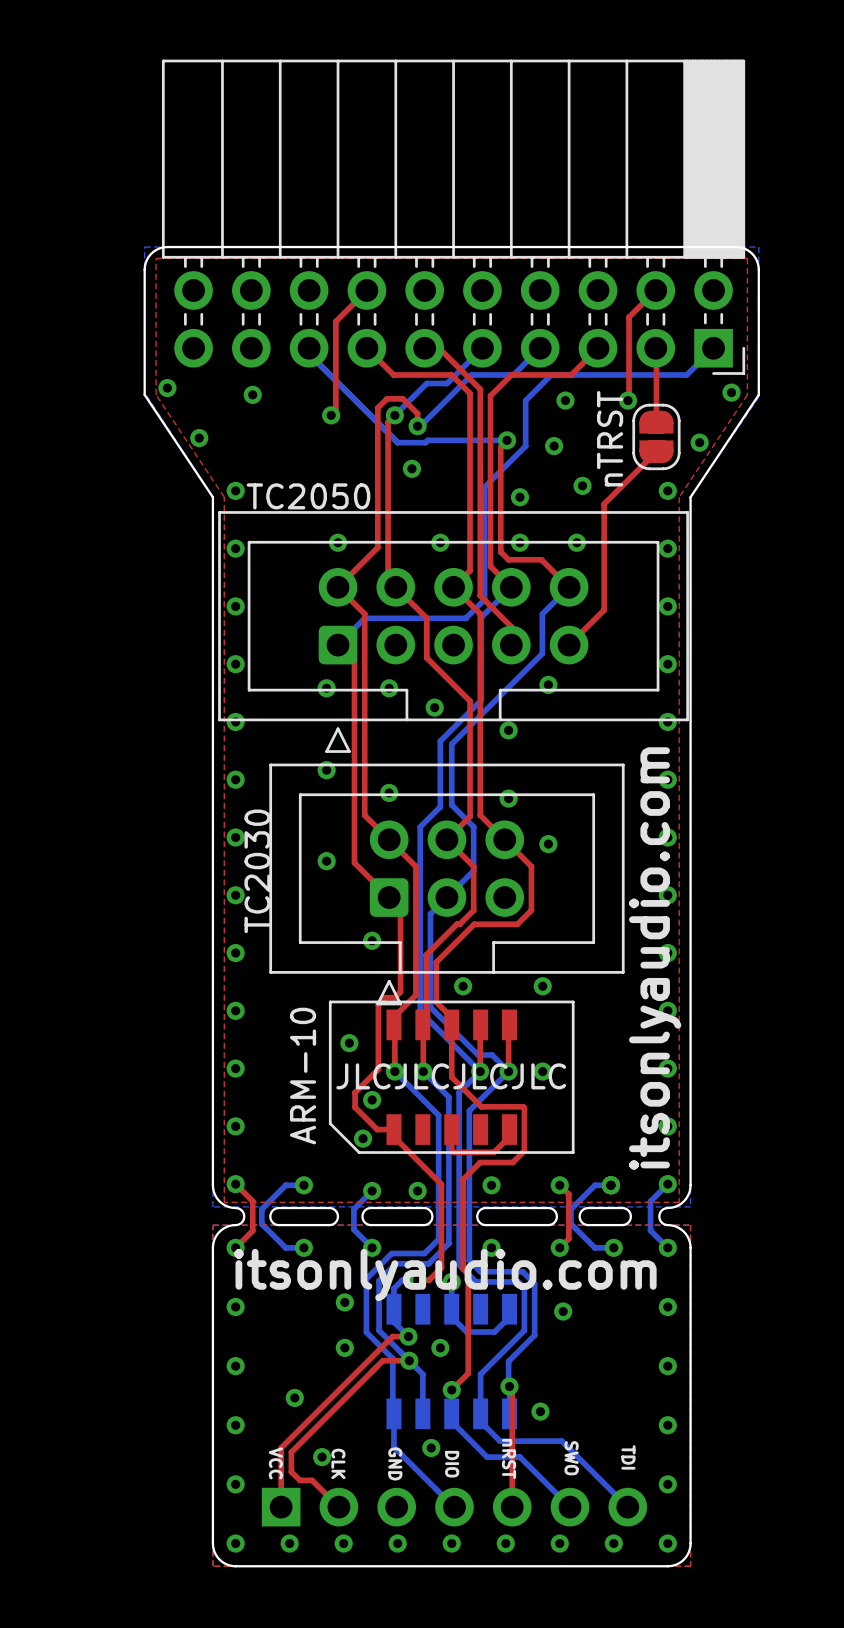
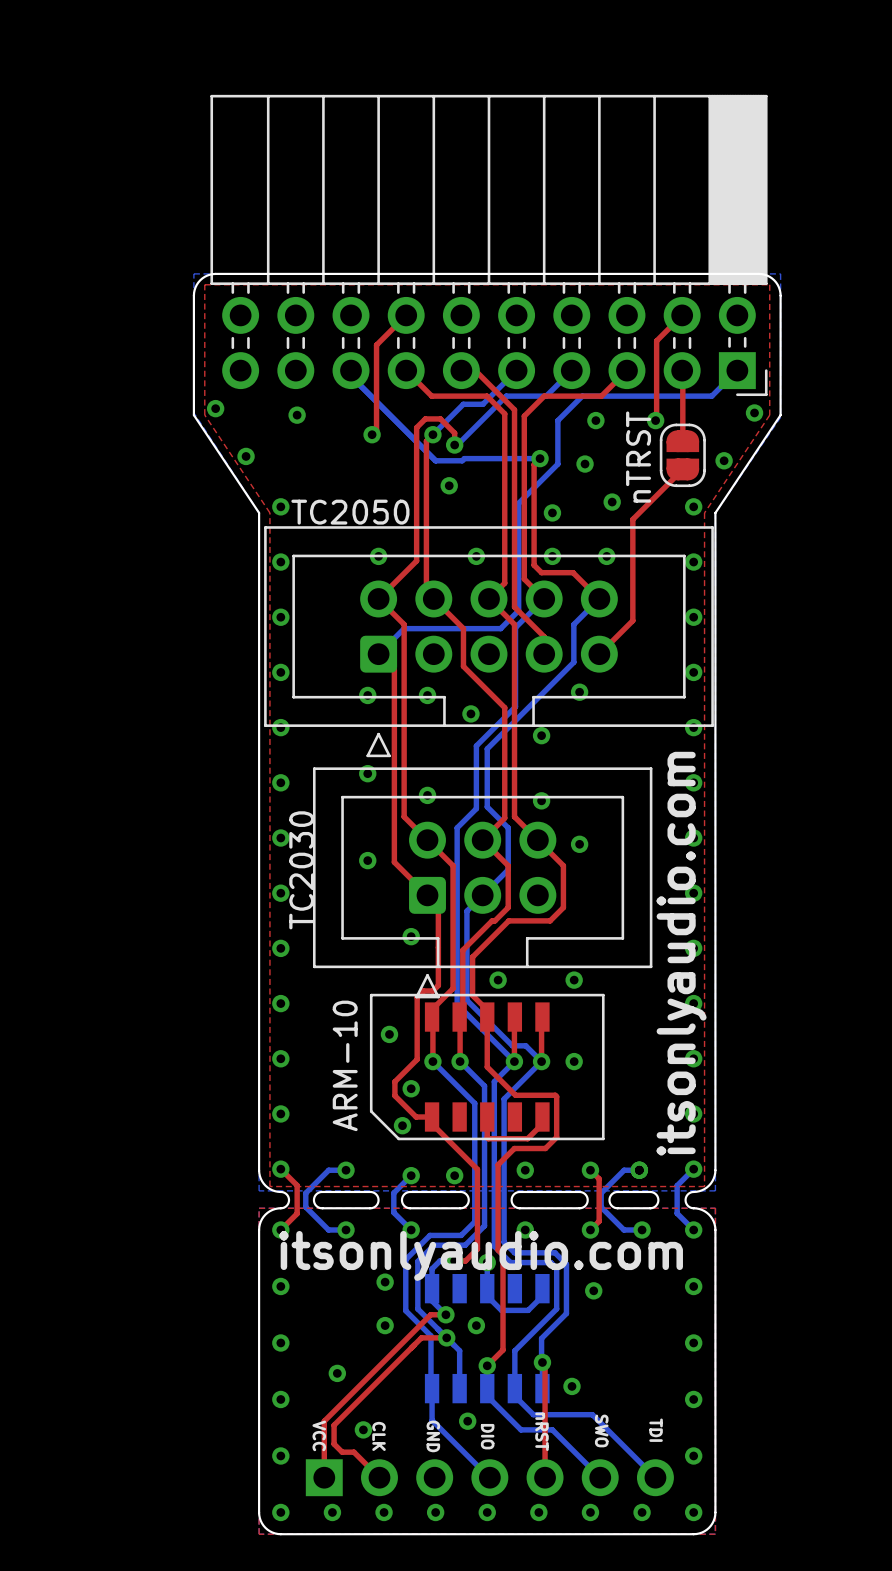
text: JLCJLCJLCJLC (451, 1076) -> none

